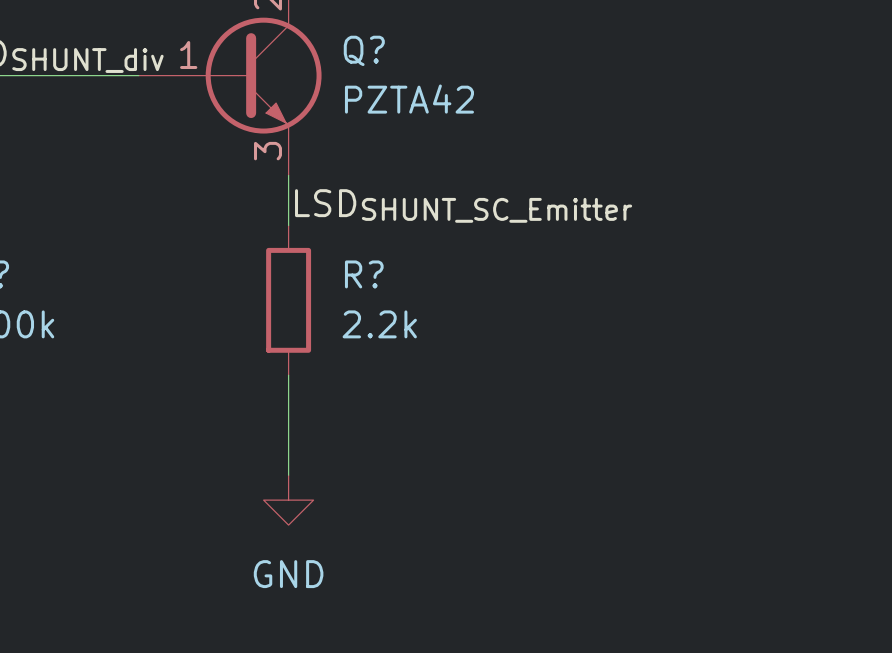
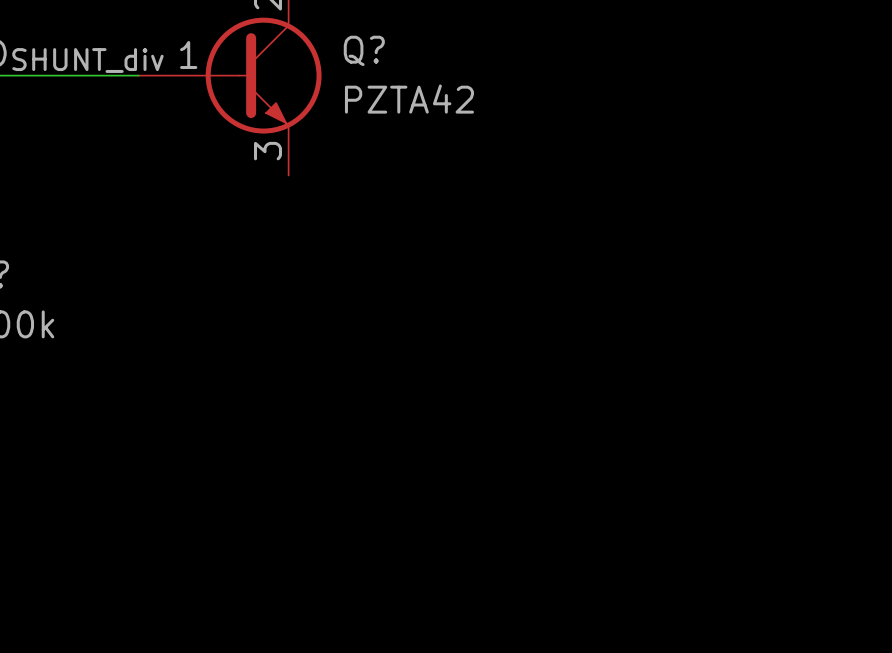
wire: (288, 175) (288, 225) -> none
label: LSDSHUNT_SC_Emitter (463, 205) -> none
R?: 2.2k (288, 300) -> none
wire: (288, 375) (288, 475) -> none
power symbol: GND (288, 500) -> none

